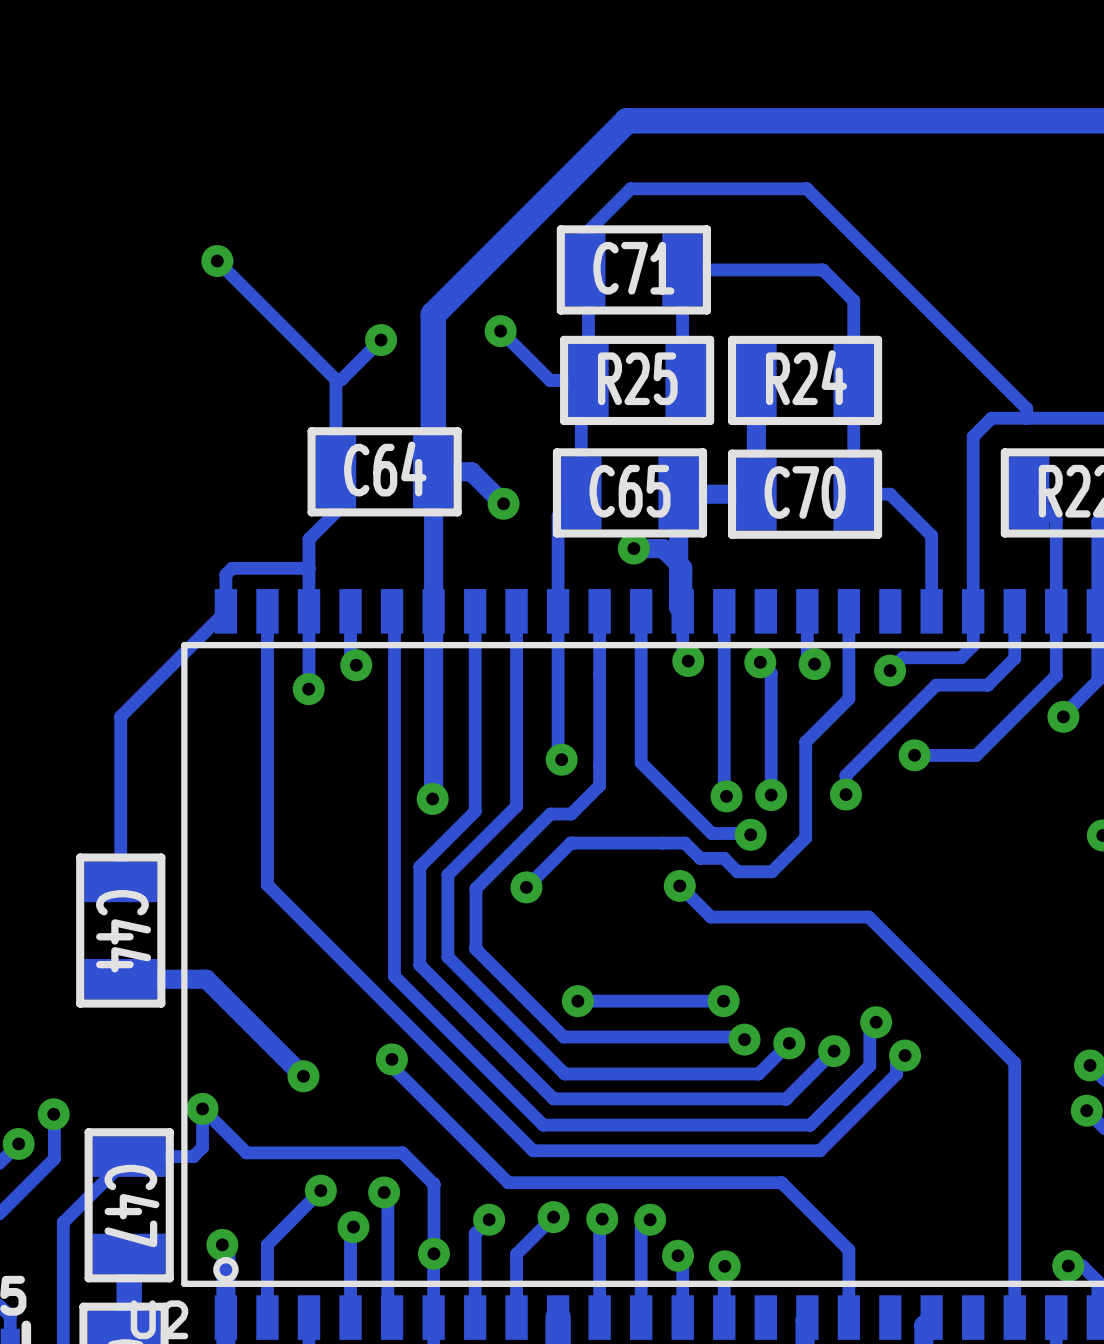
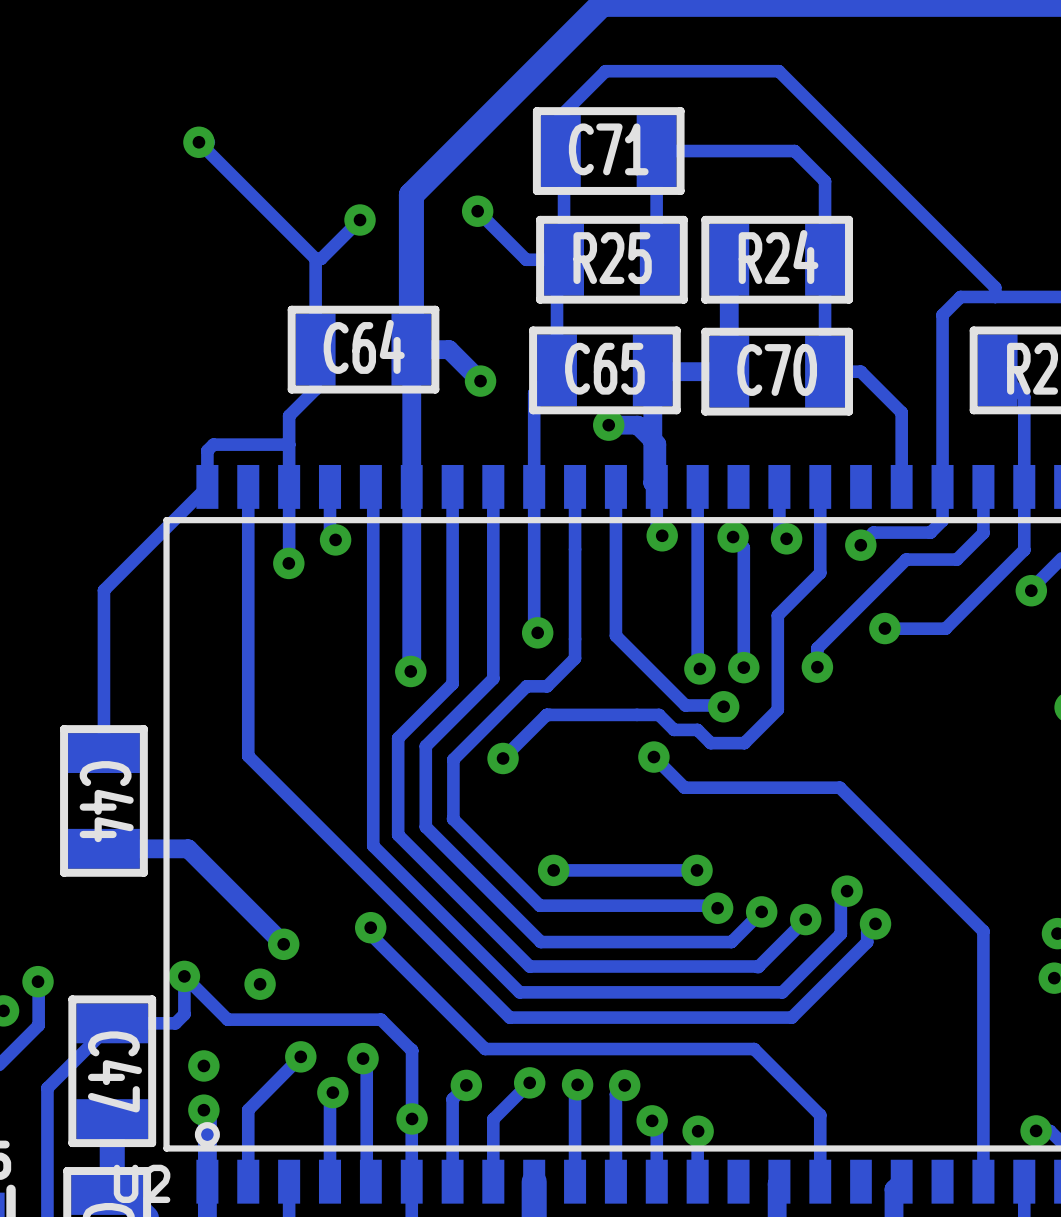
via: none -> (260, 984)
via: none -> (203, 1065)

